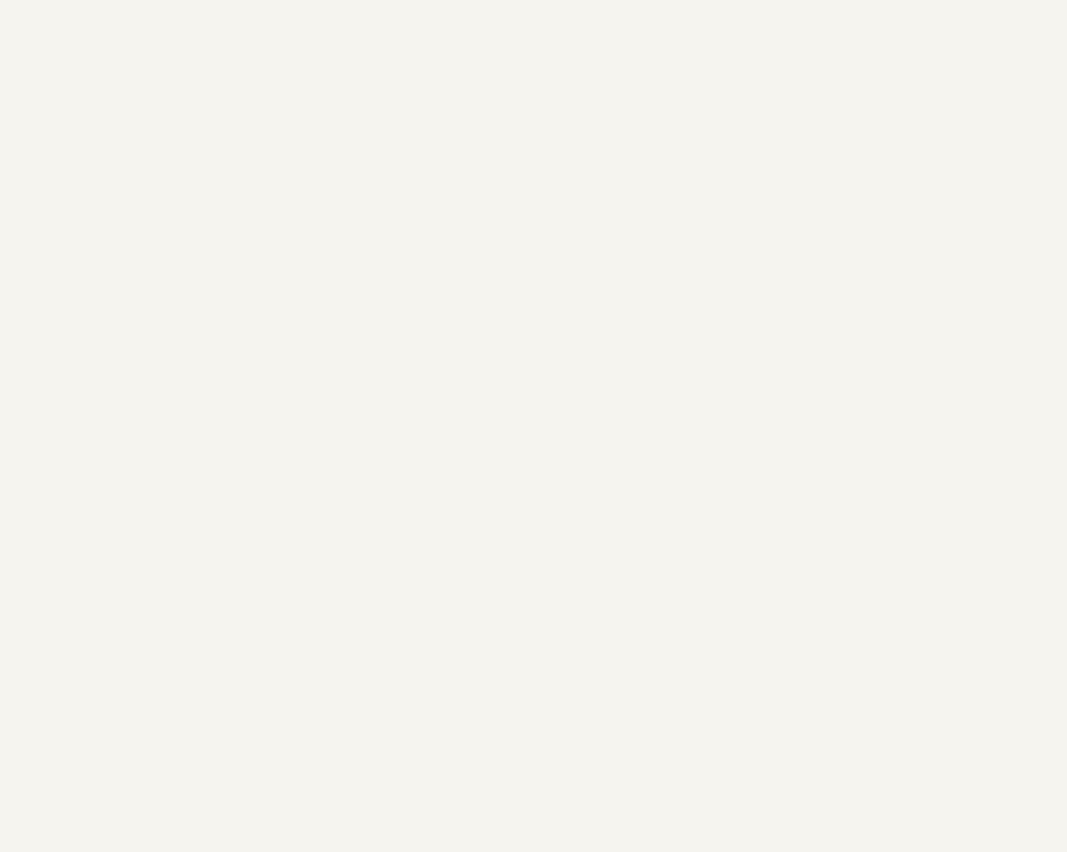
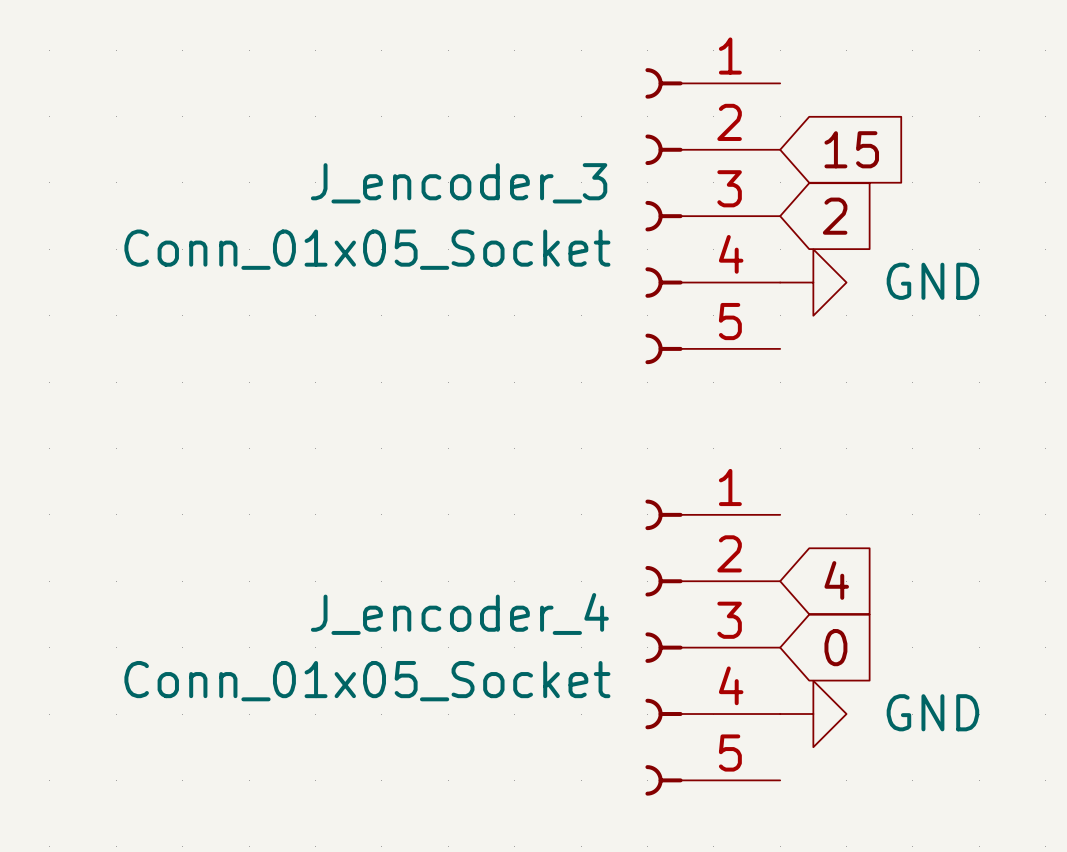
global label: none -> 15 (851, 149)
J_encoder_3: none -> Conn_01x05_Socket (712, 216)
global label: none -> 2 (835, 216)
power symbol: none -> GND (813, 282)
global label: none -> 4 (836, 580)
J_encoder_4: none -> Conn_01x05_Socket (712, 647)
global label: none -> 0 (835, 647)
power symbol: none -> GND (813, 714)

